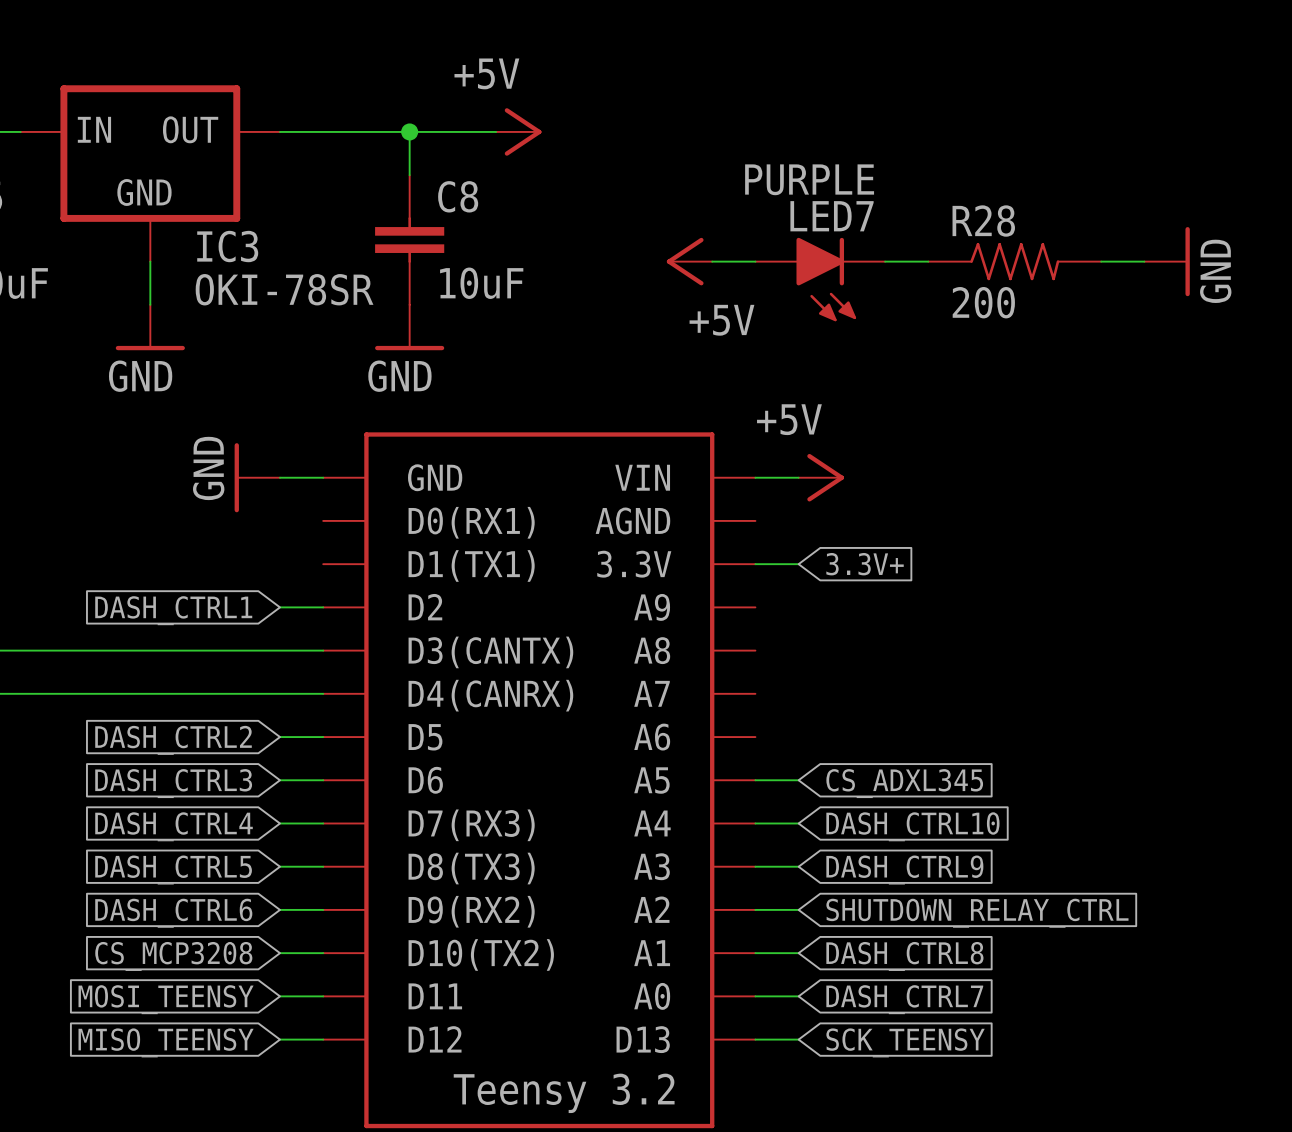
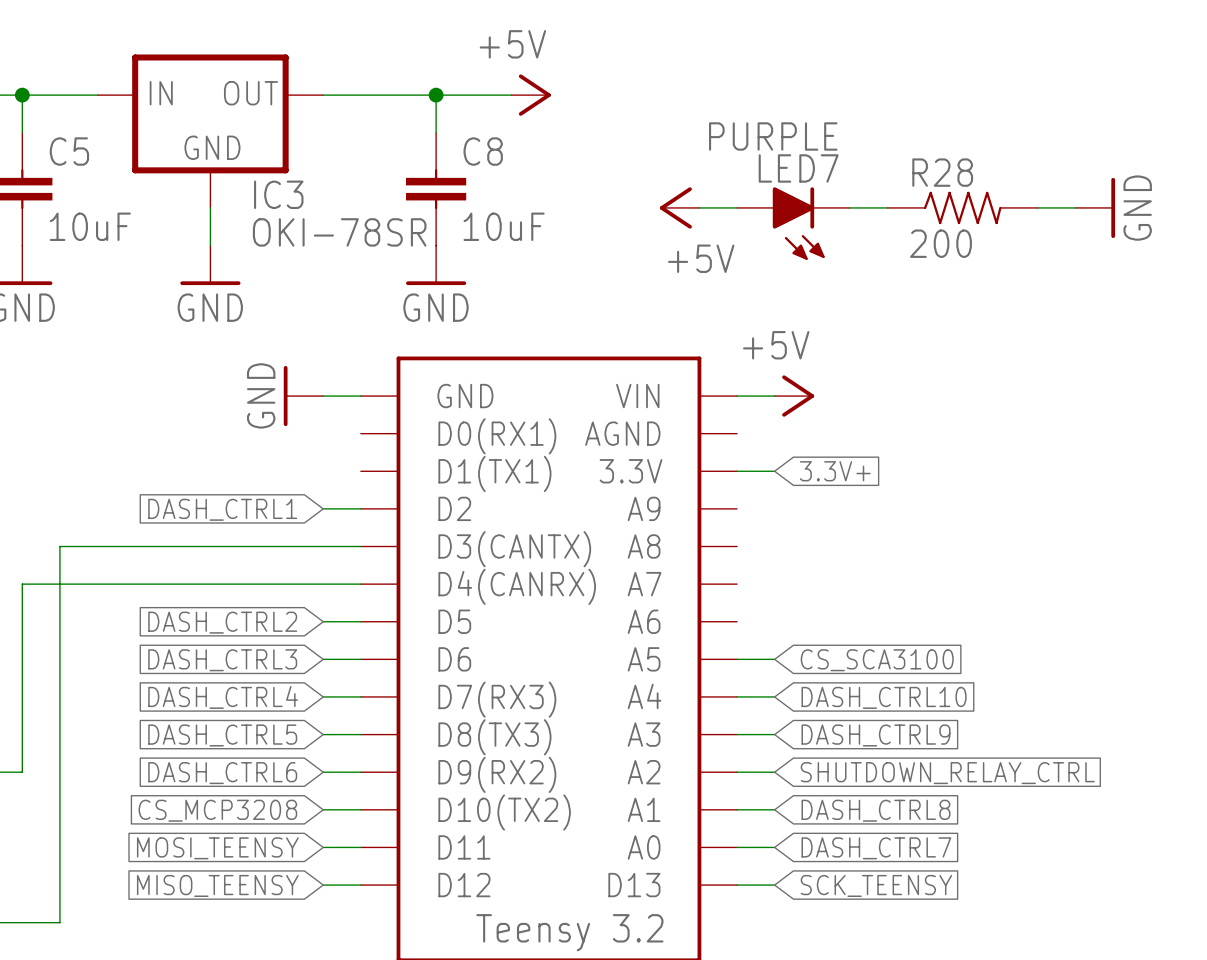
global label: CS_ADXL345 (904, 783) -> CS_SCA3100 (877, 660)

